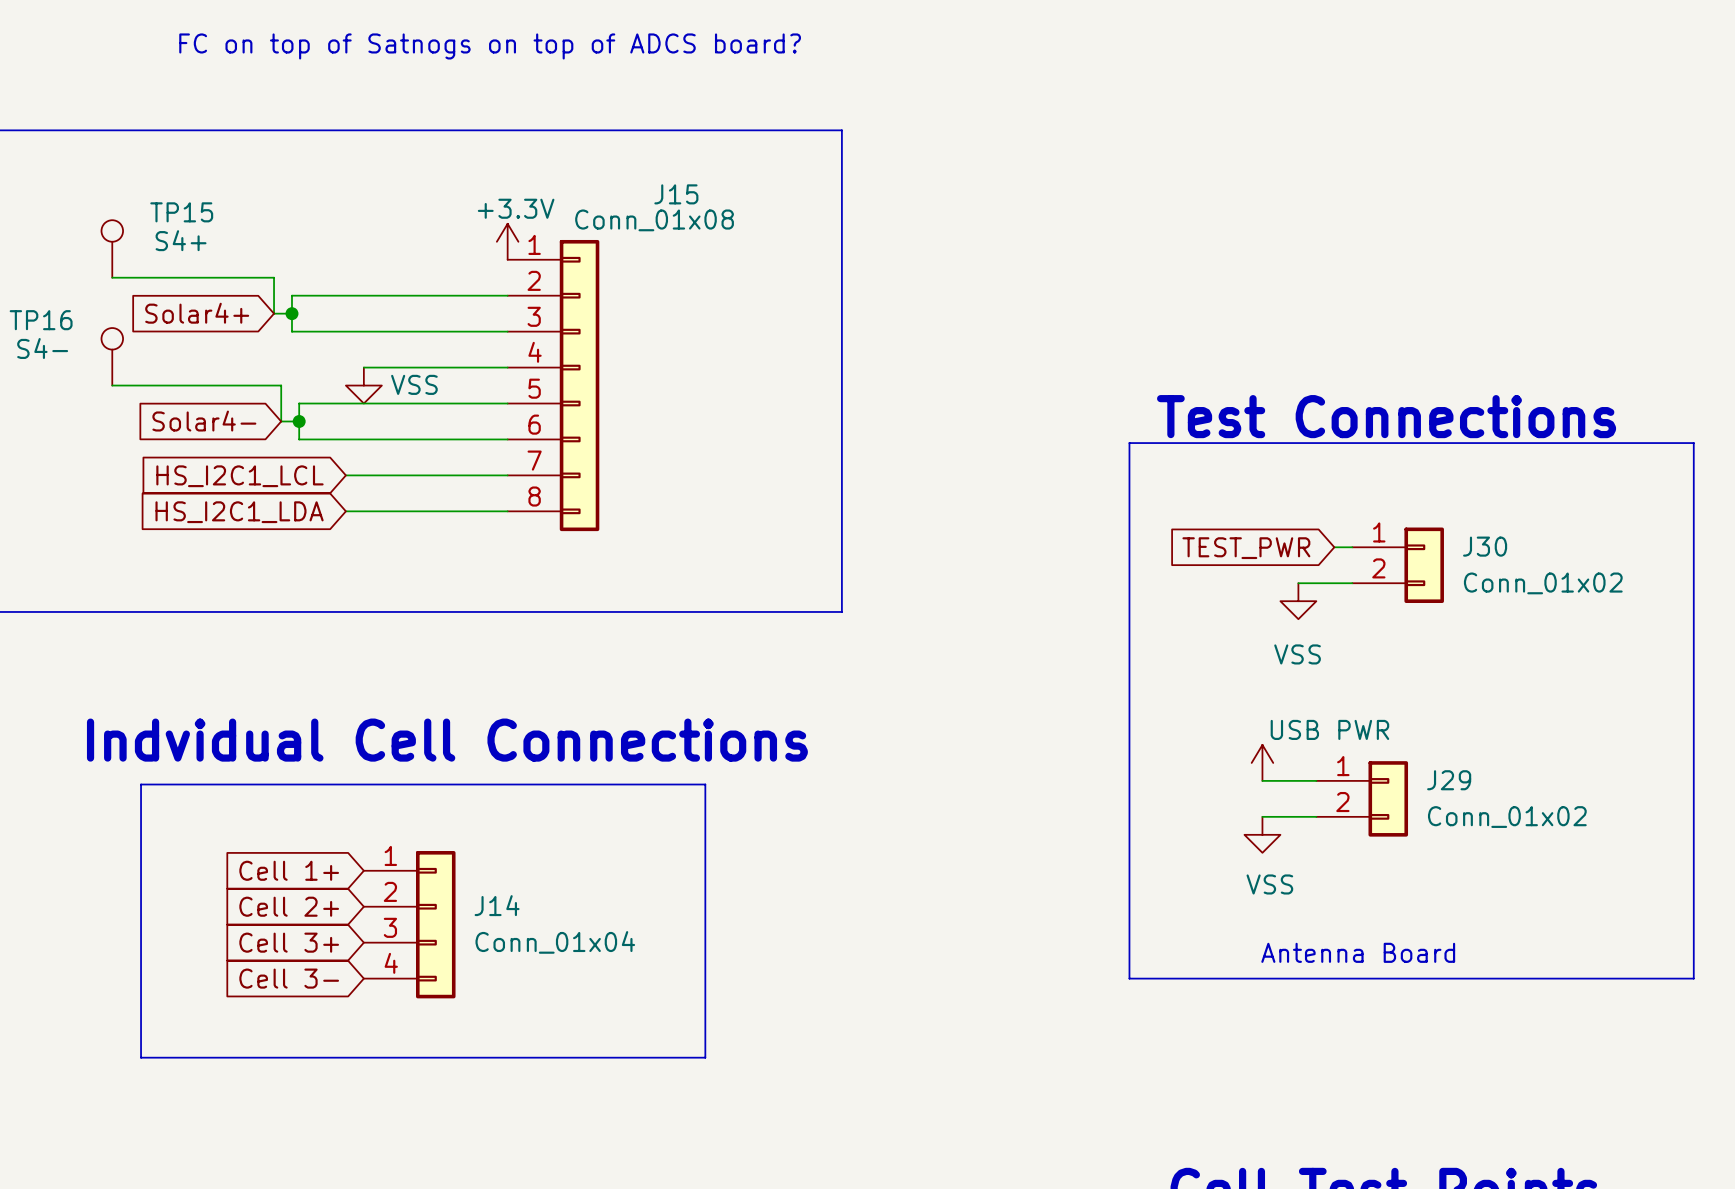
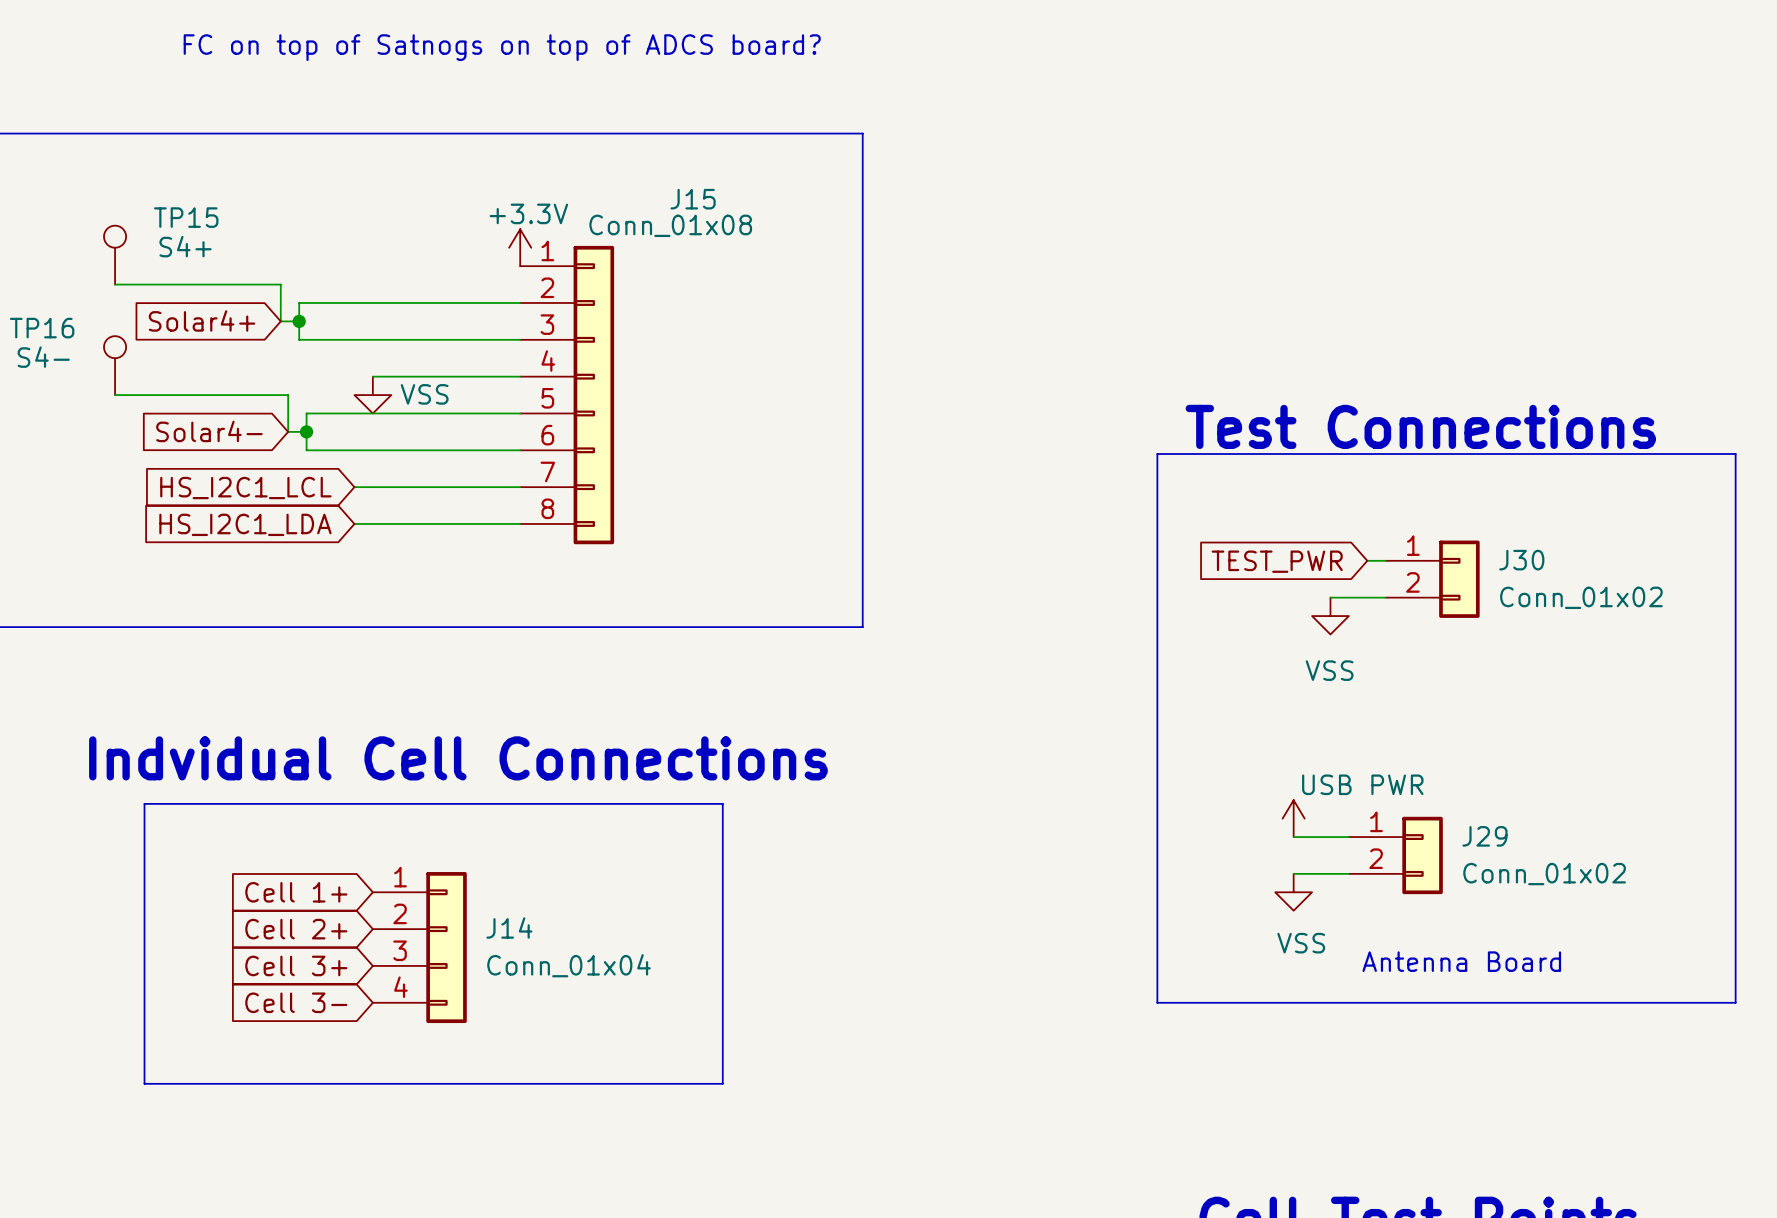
power symbol position: USB PWR (1262, 762) -> USB PWR (1293, 818)
wire: (1262, 780) (1316, 780) -> (1293, 873) (1348, 873)
J29 position: (1362, 798) -> (1395, 855)
power symbol position: VSS (1262, 834) -> VSS (1293, 892)
text position: Antenna Board (1358, 952) -> Antenna Board (1461, 961)

